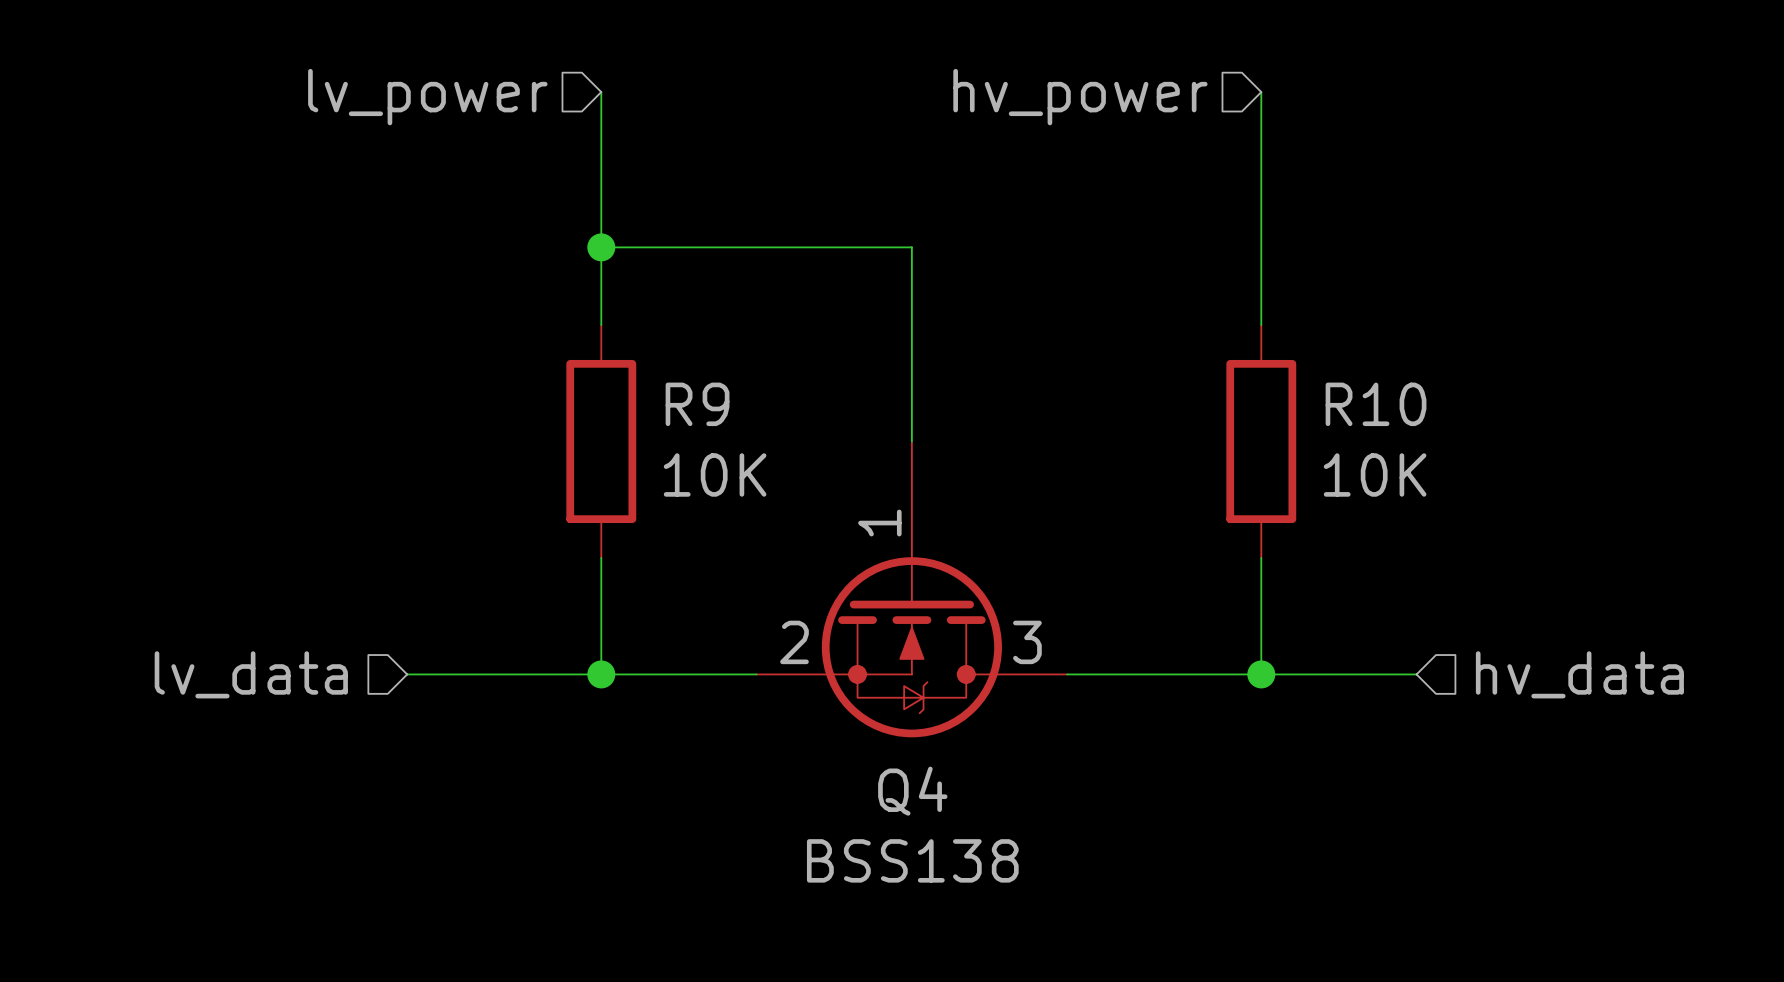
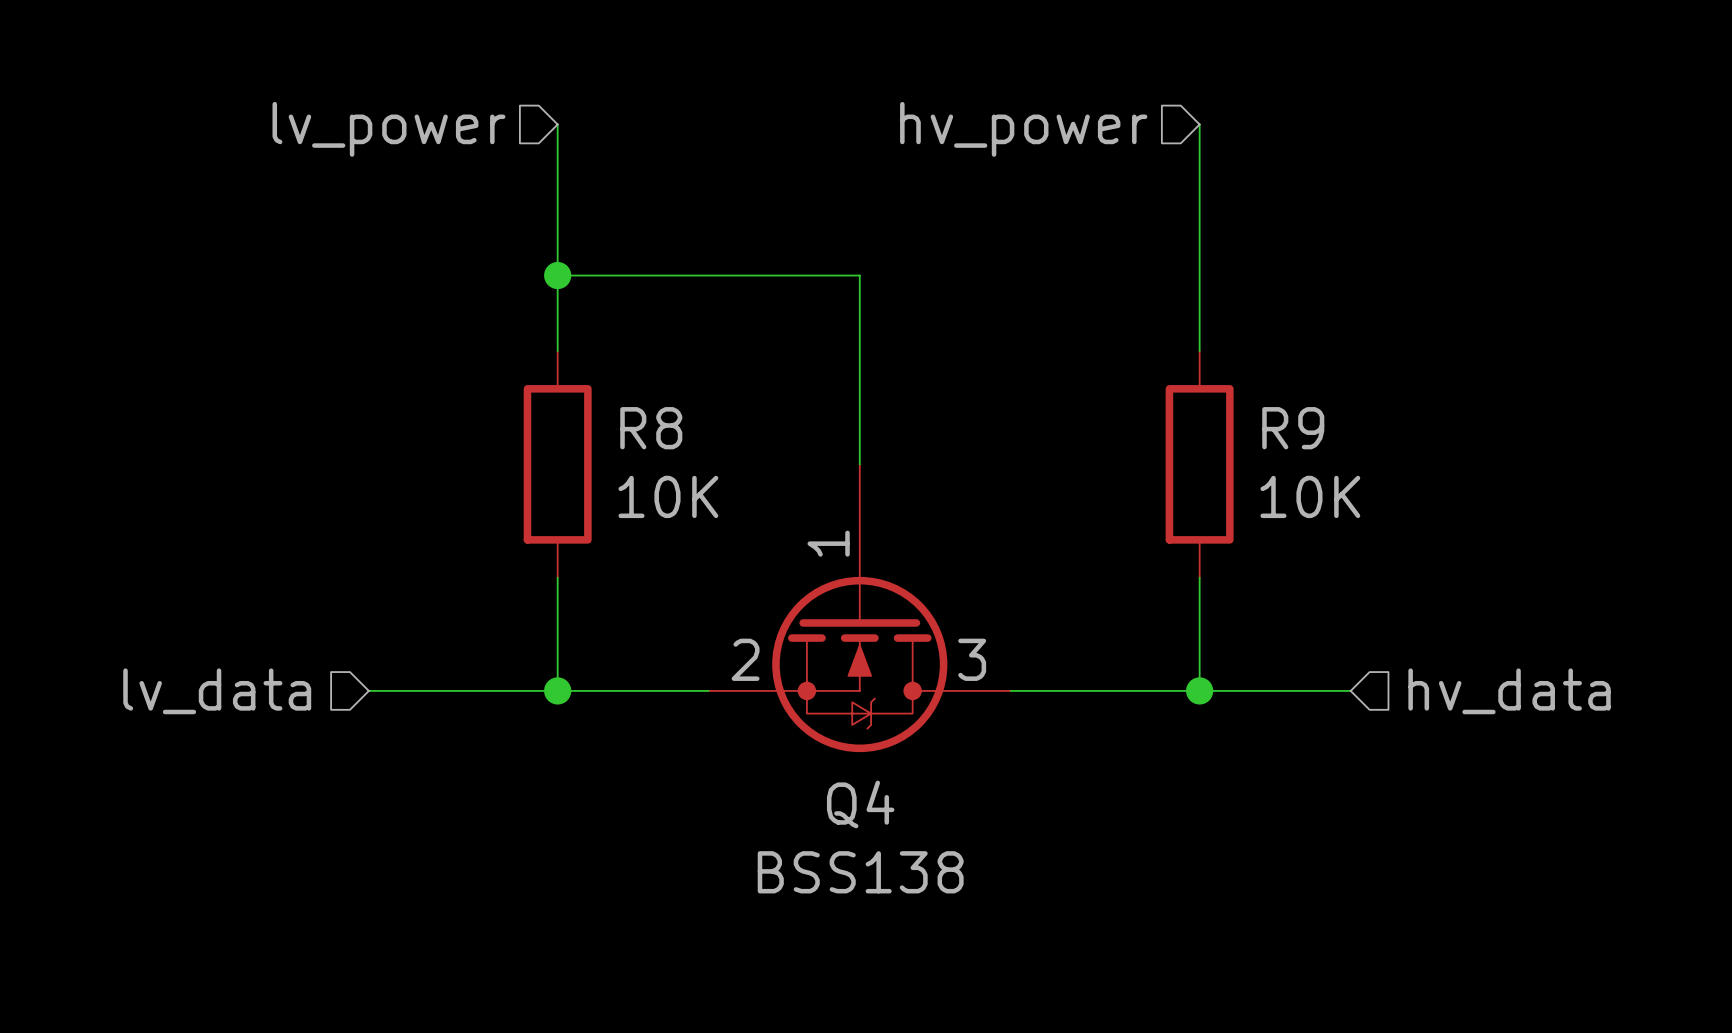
R9 name: R9 (697, 404) -> R8 (651, 428)
R10 name: R10 (1376, 404) -> R9 (1293, 428)

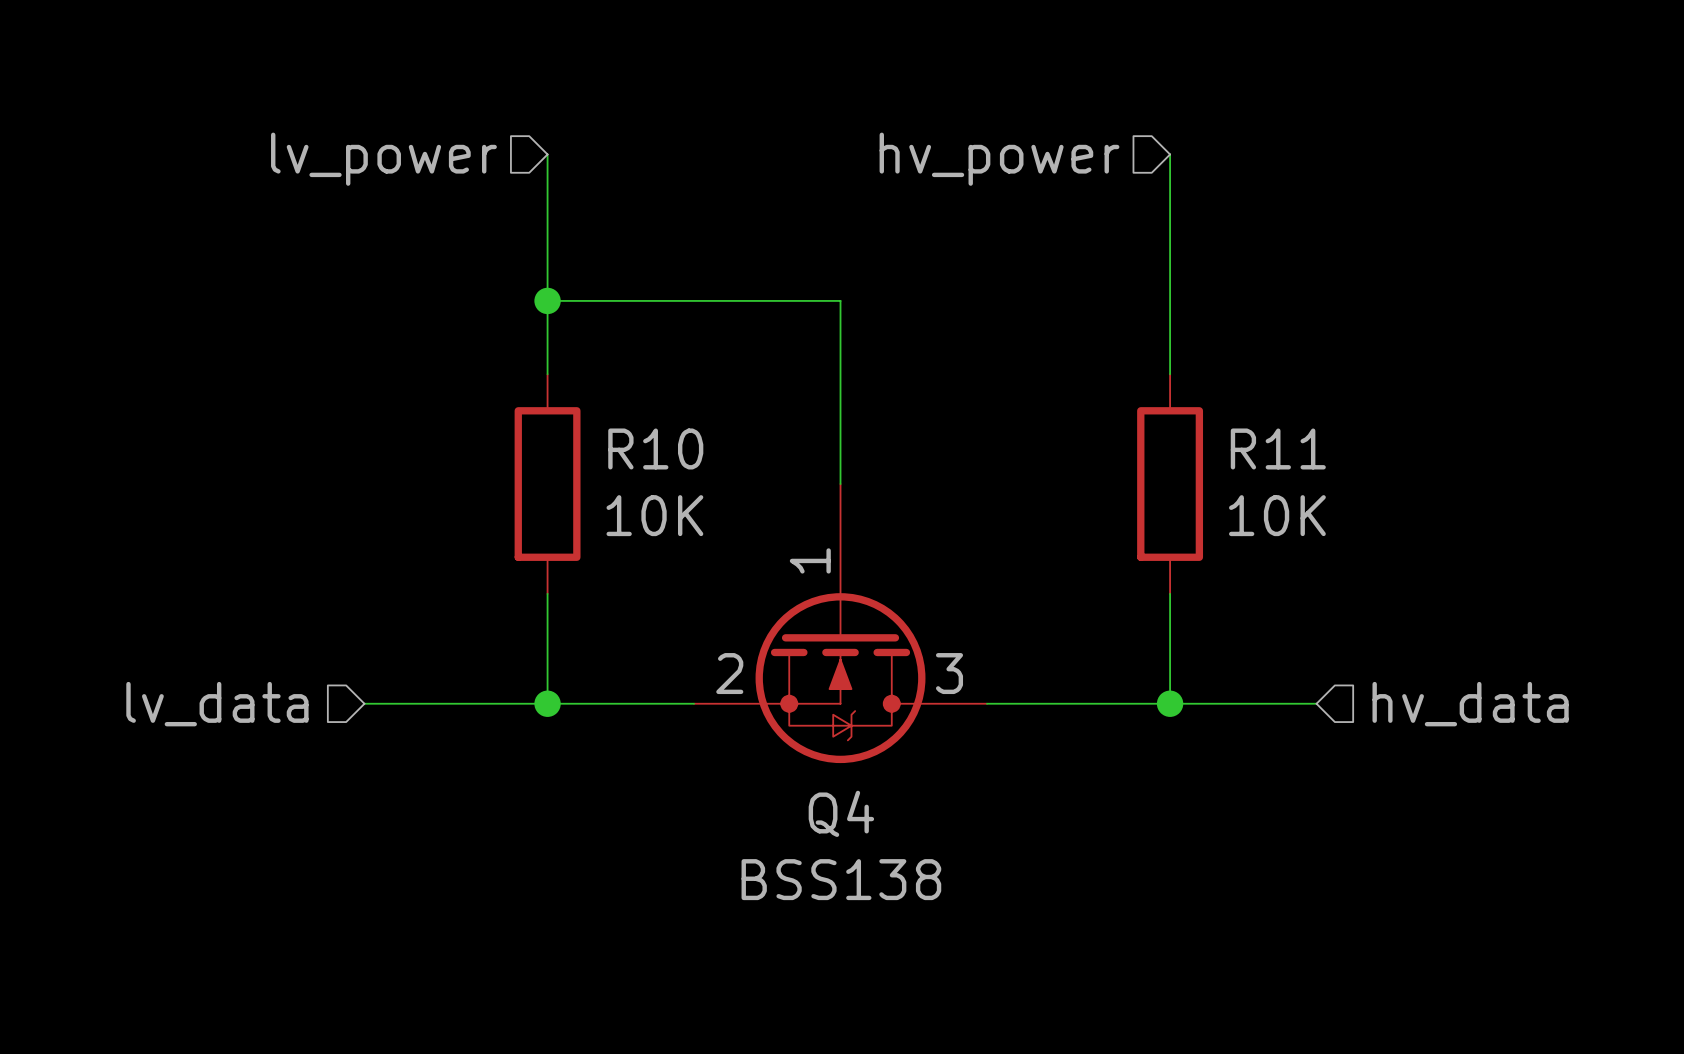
R8 name: R8 (651, 428) -> R10 (655, 448)
R9 name: R9 (1293, 428) -> R11 (1278, 448)

